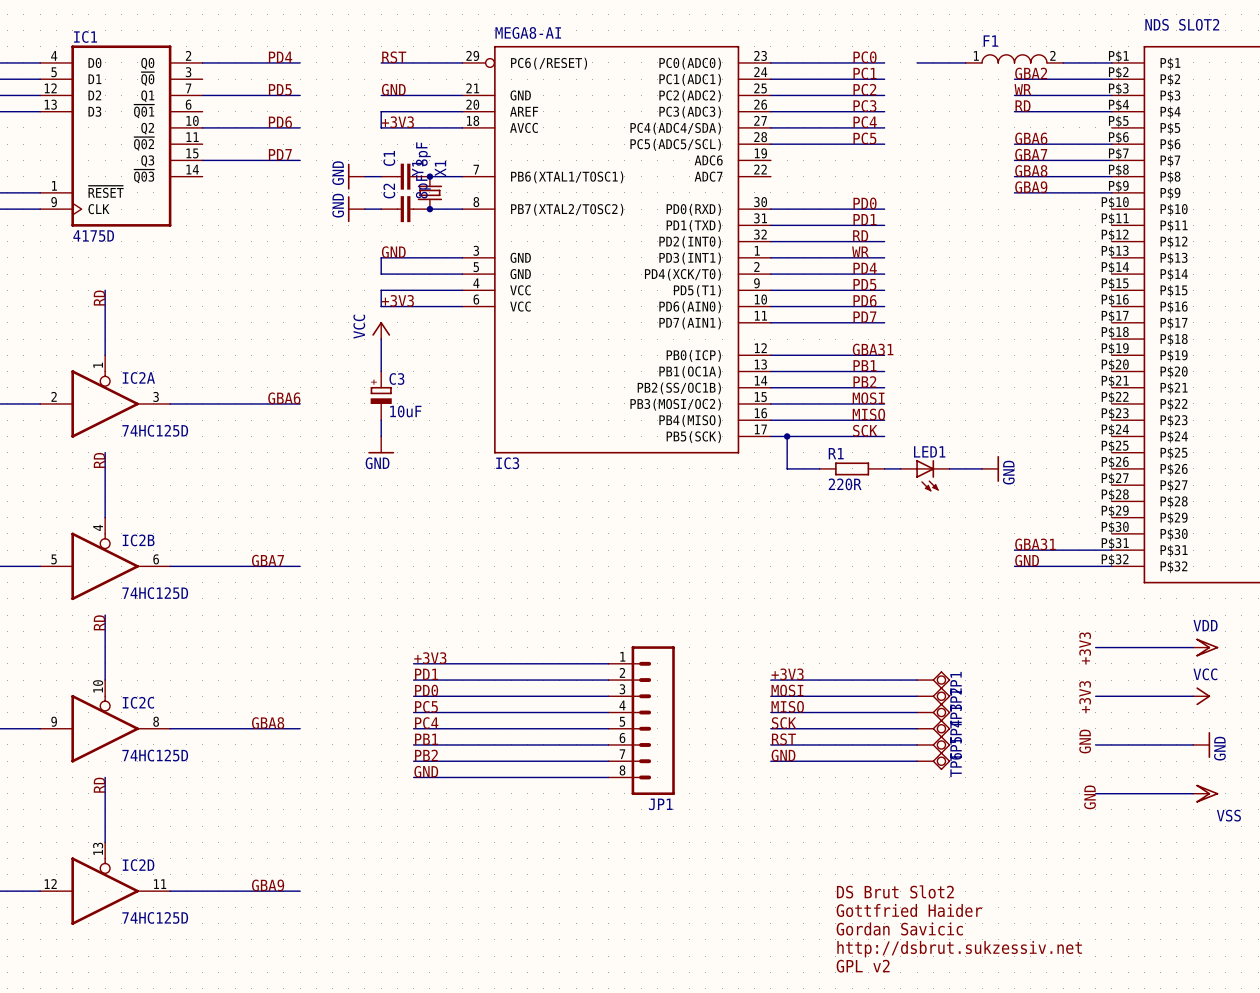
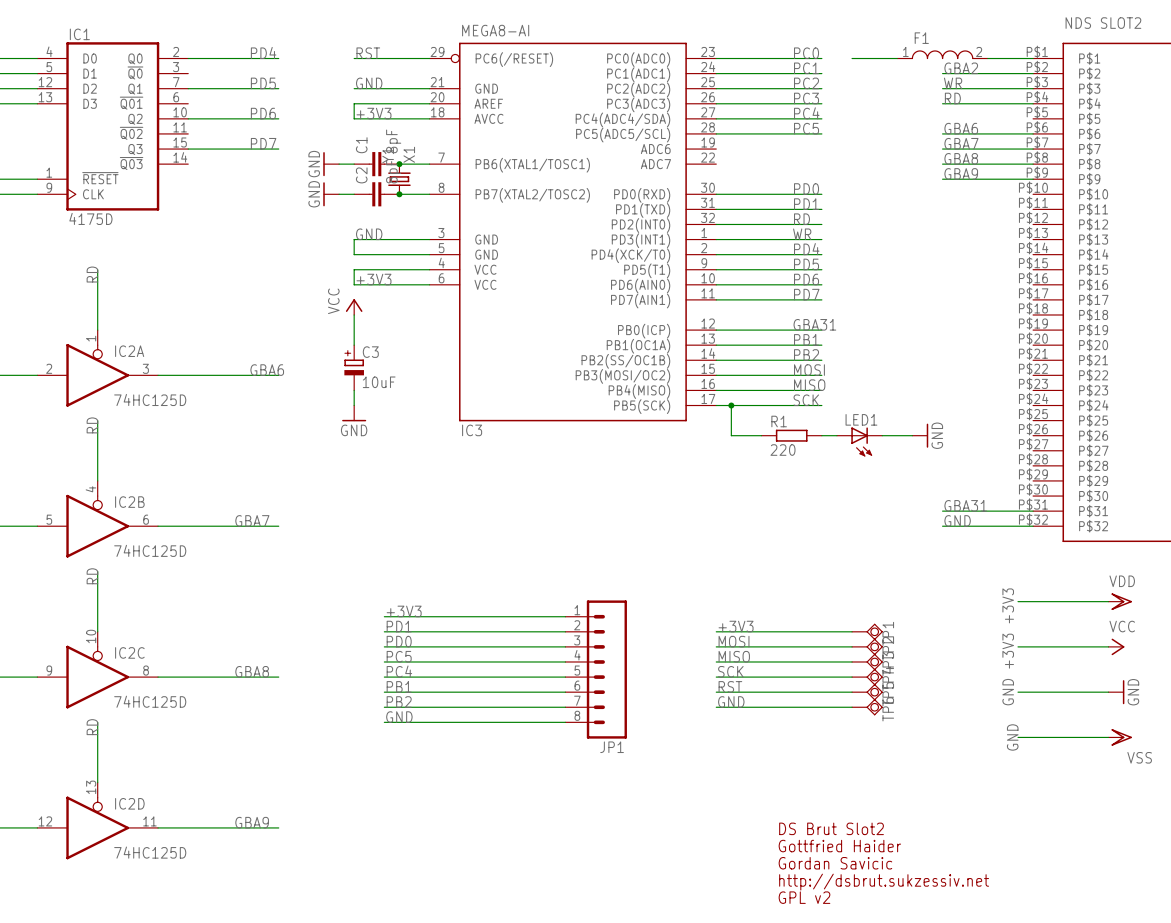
R1 value: 220R (845, 484) -> 220 (782, 450)

